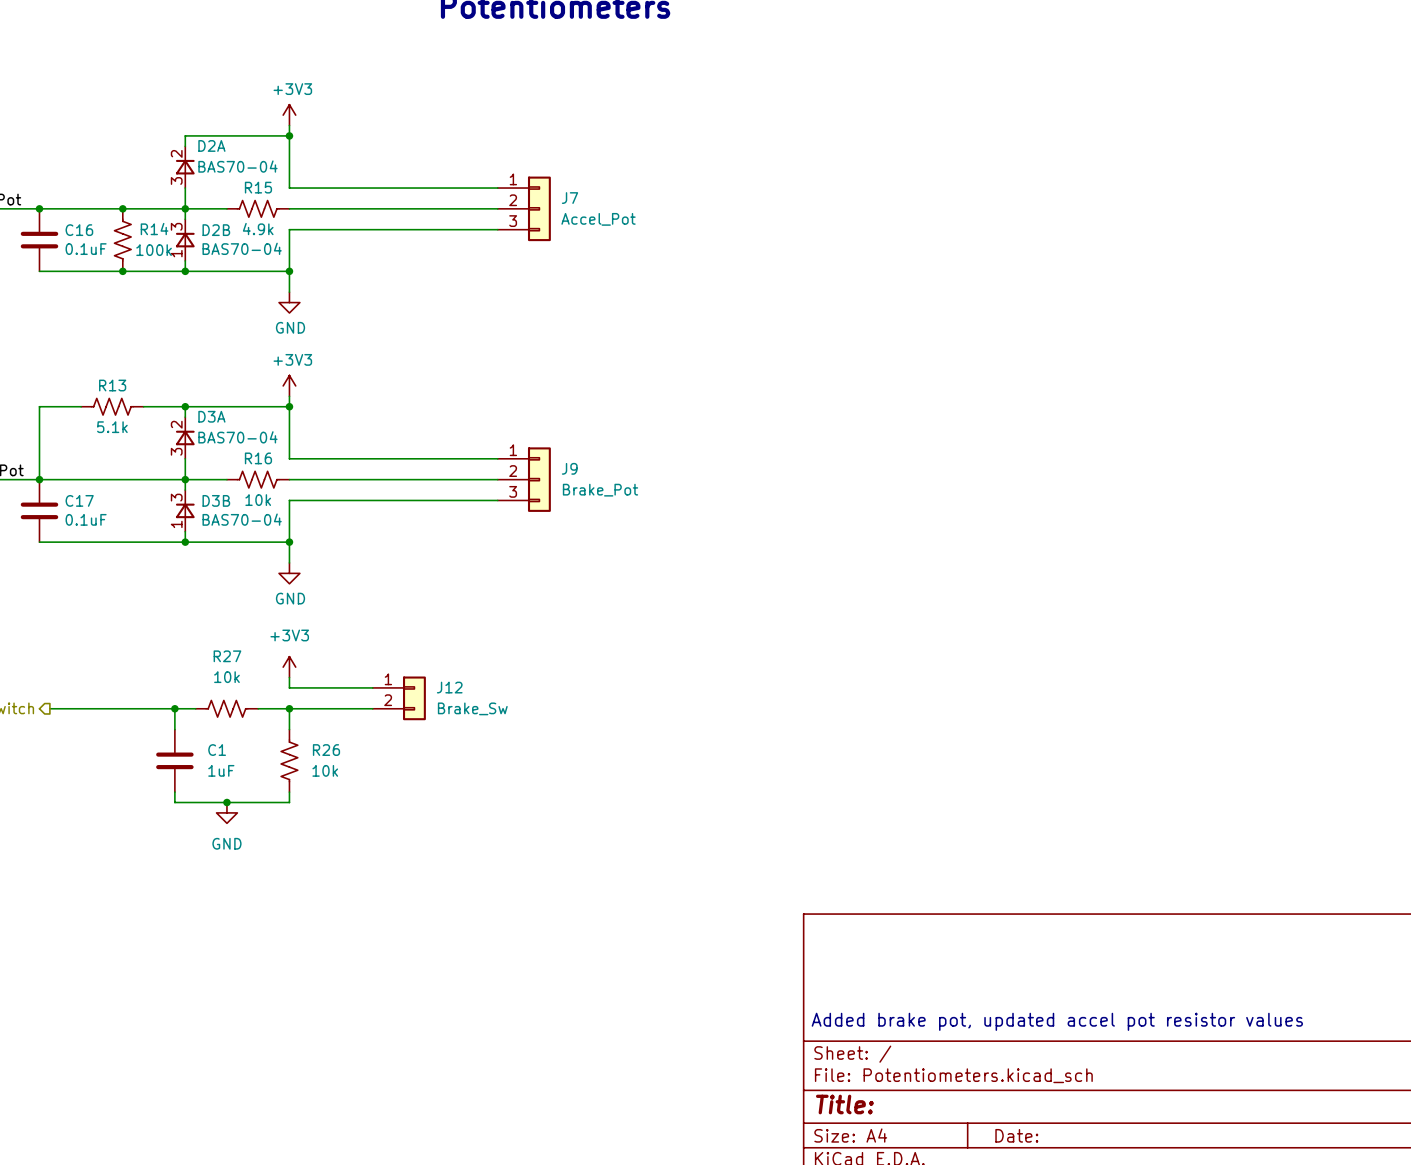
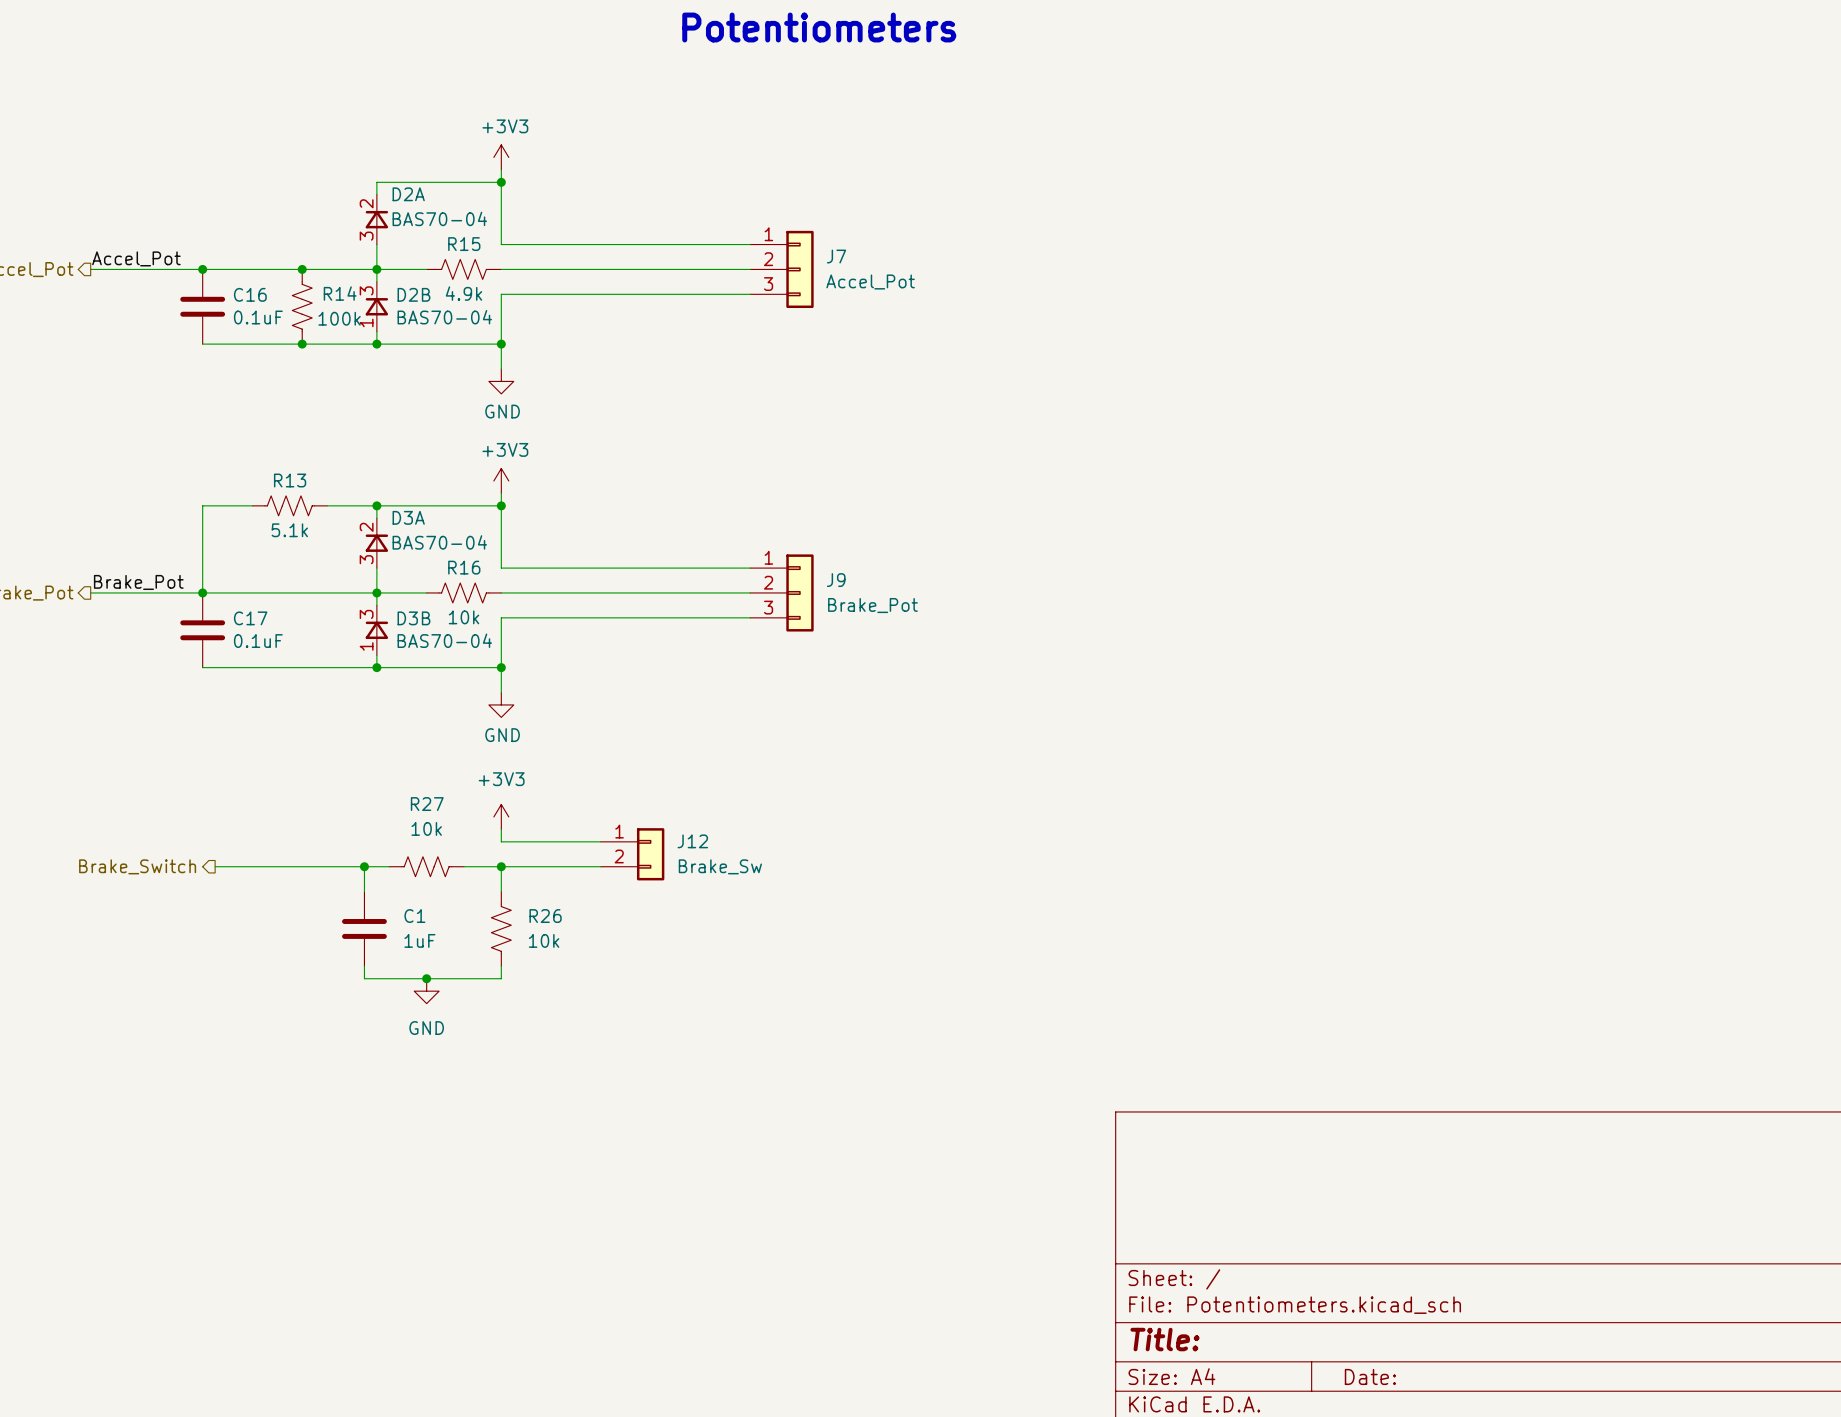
text: Added brake pot, updated accel pot resistor values (1057, 1021) -> none

